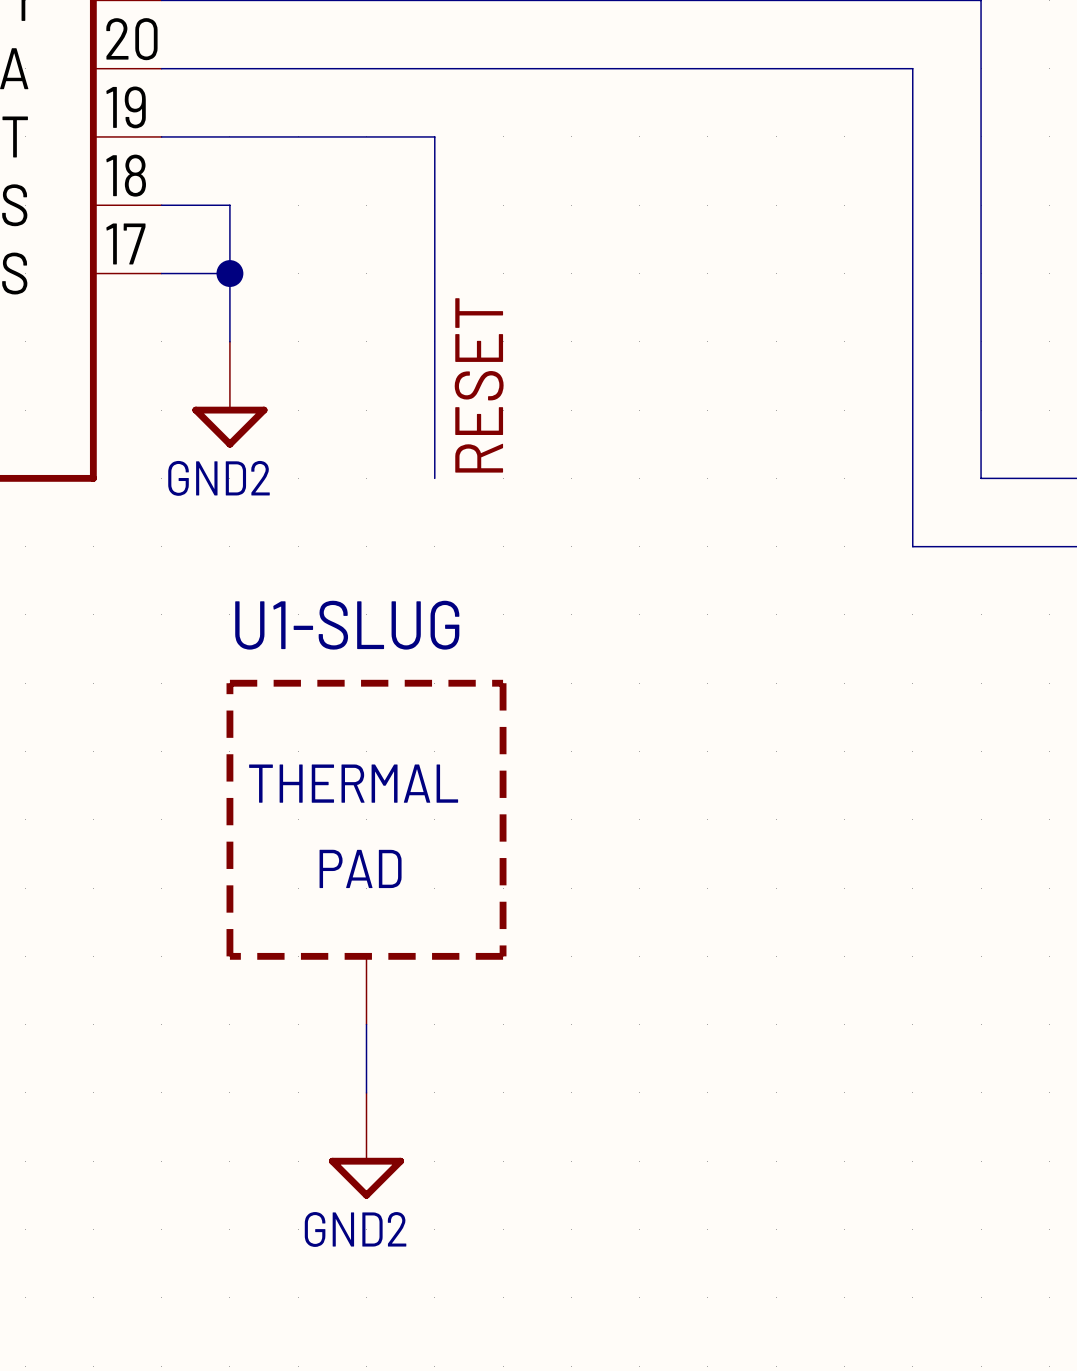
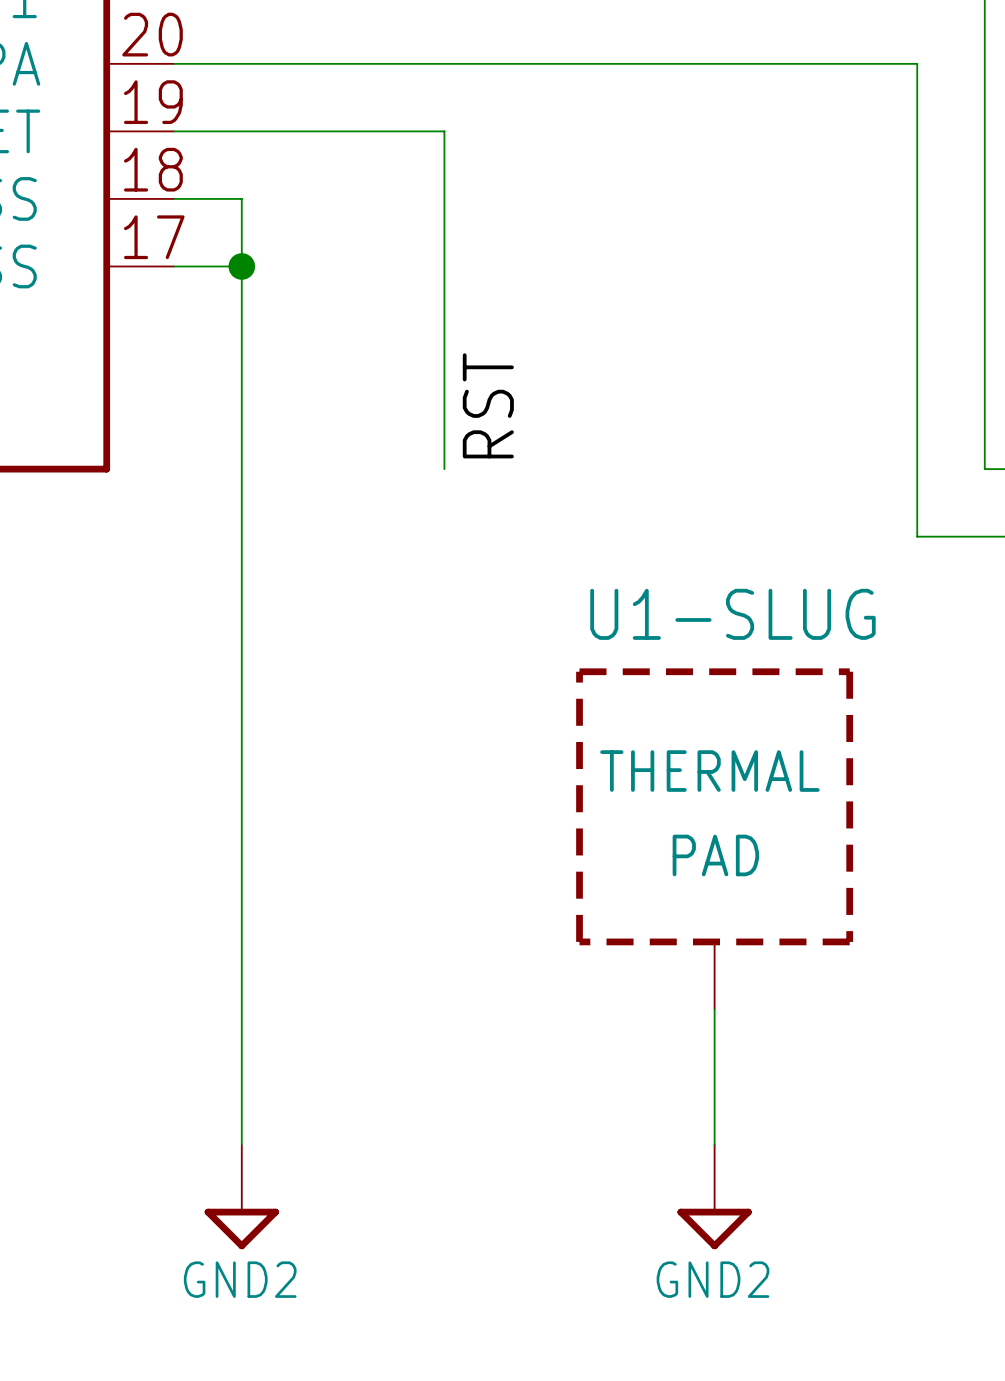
wire: none -> (241, 334) (241, 1144)
label: RESET (479, 385) -> RST (488, 405)
power symbol: GND2 (229, 394) -> none
U1-SLUG position: (366, 852) -> (714, 838)
wire: (366, 1024) (366, 1092) -> none
wire: none -> (714, 1009) (714, 1144)
power symbol position: GND2 (366, 1145) -> GND2 (241, 1196)
power symbol: none -> GND2 (714, 1196)

